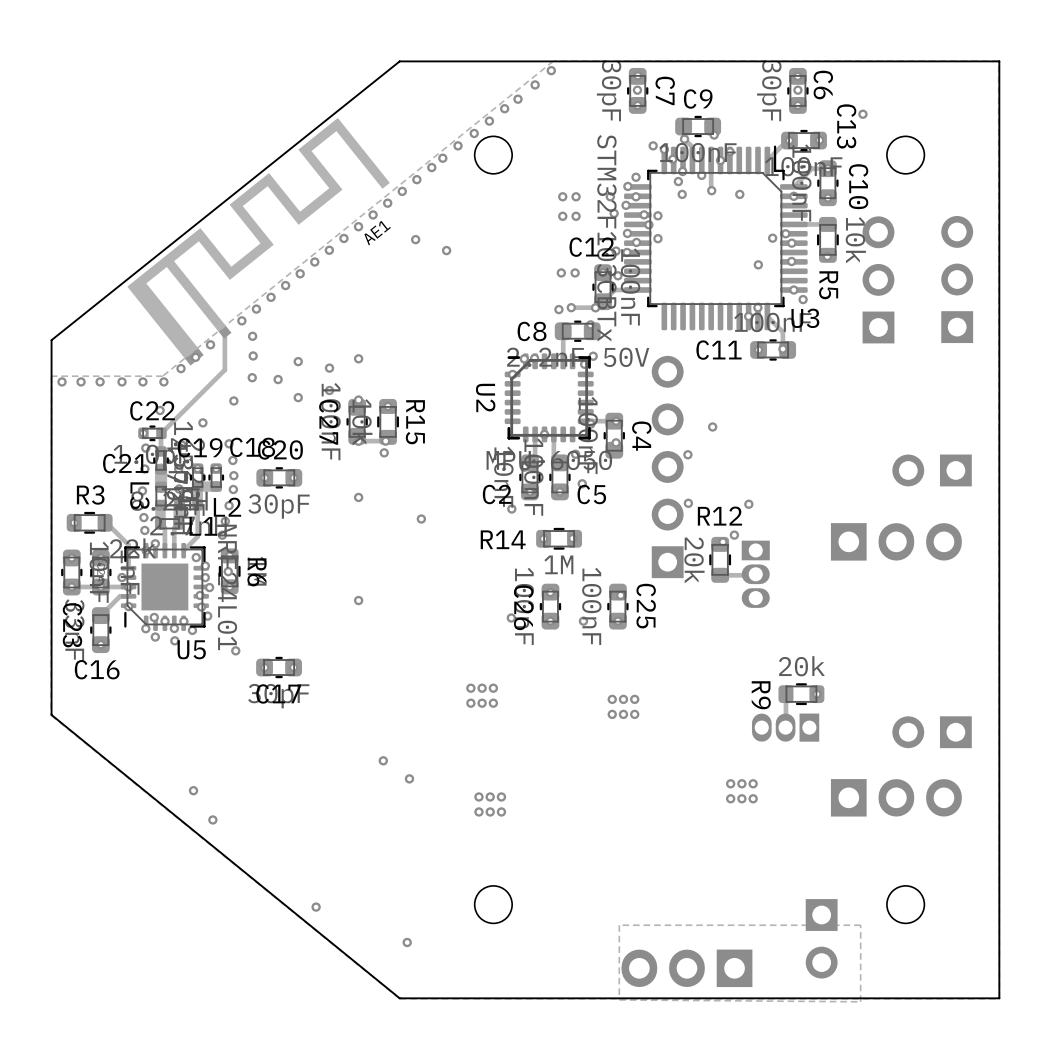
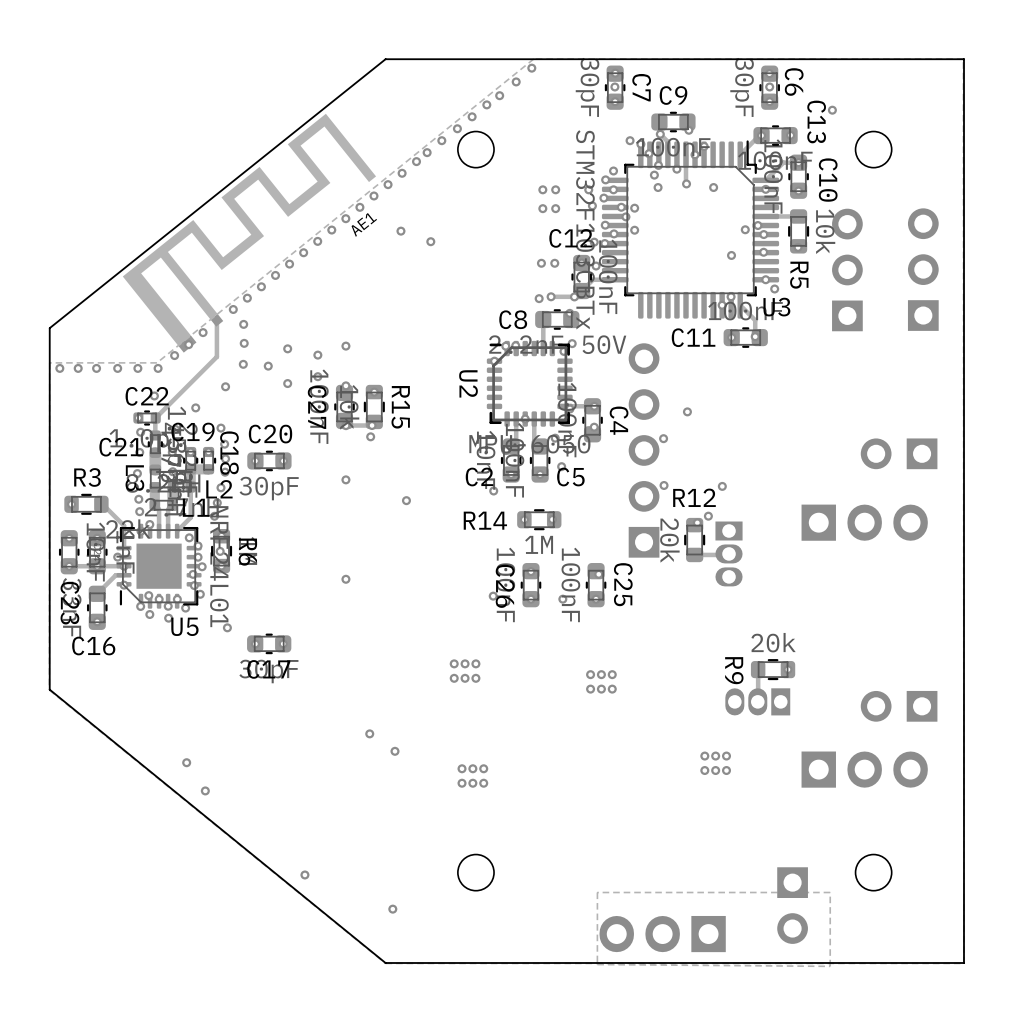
C18 name rotation: 0° (252, 447) -> 90° clockwise (229, 453)

